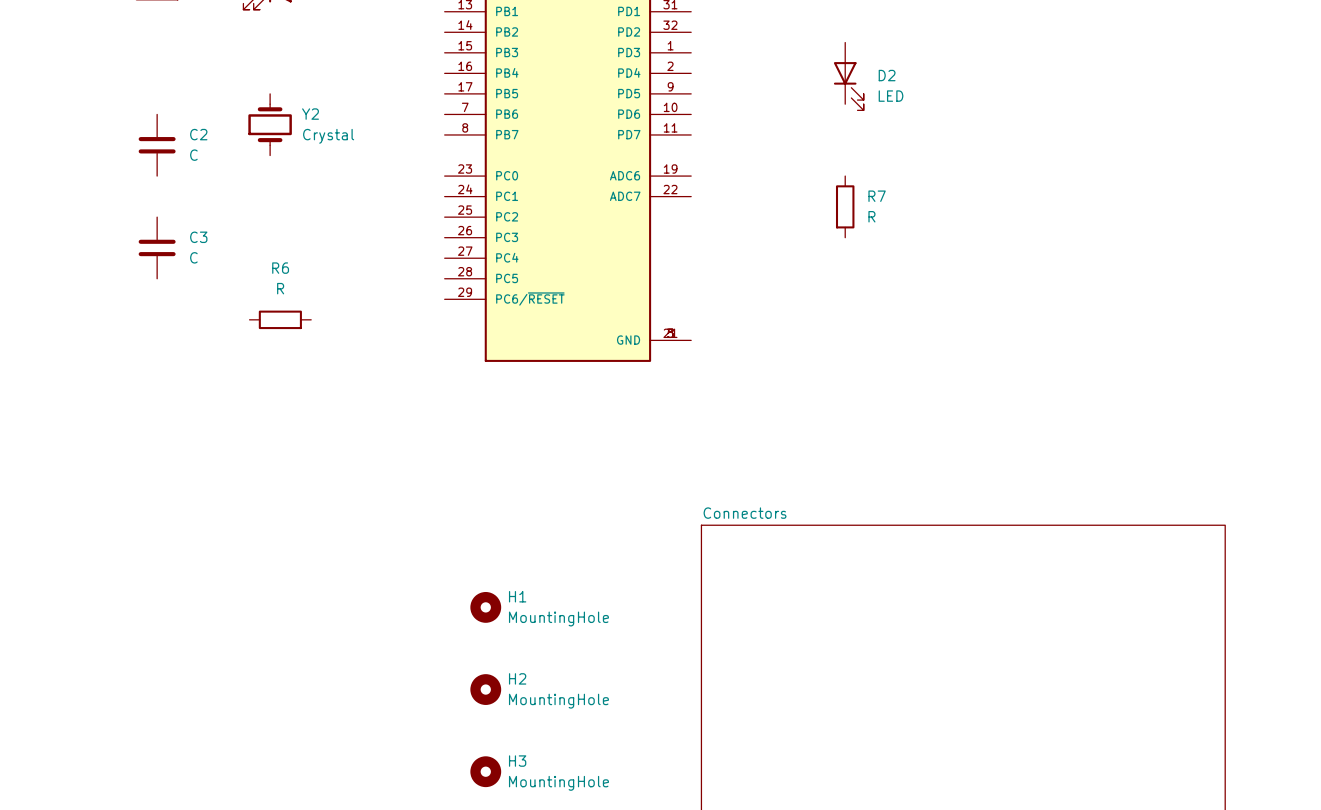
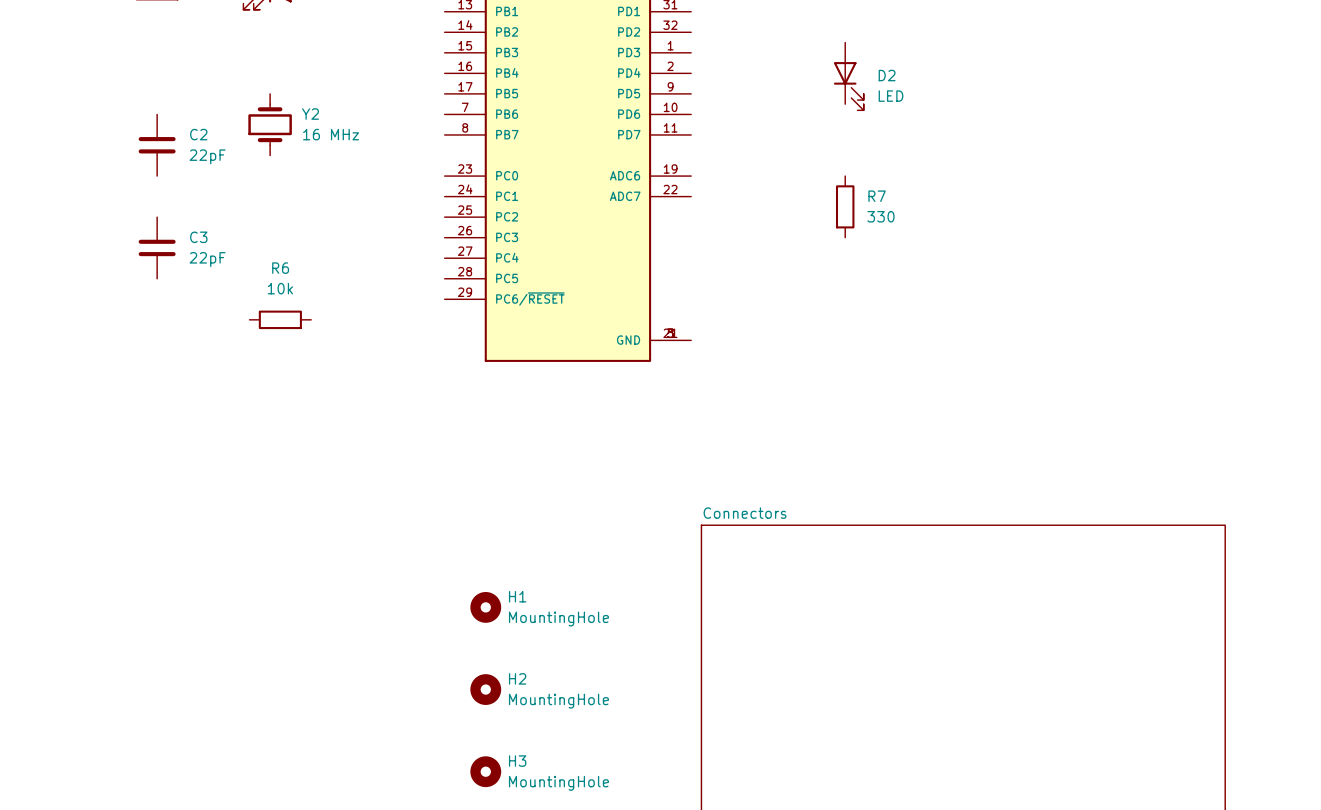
Y2 value: Crystal (328, 136) -> 16 MHz (331, 134)
C2 value: C (193, 155) -> 22pF (207, 156)
R7 value: R (871, 216) -> 330 (880, 216)
C3 value: C (193, 257) -> 22pF (207, 259)
R6 value: R (280, 288) -> 10k (280, 288)

